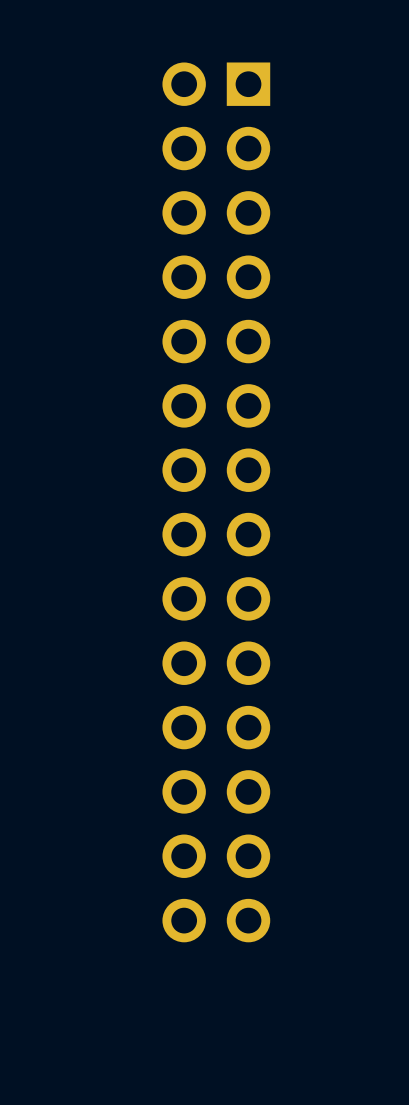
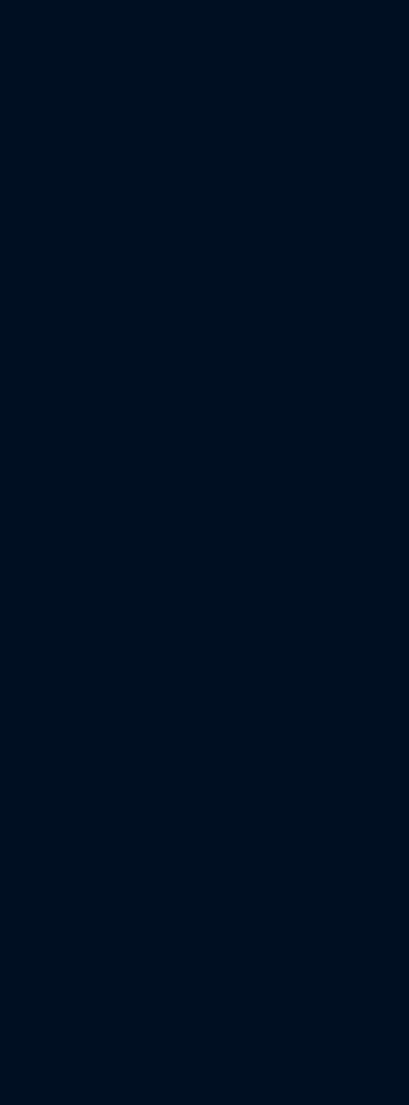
part: (216, 502) -> none

